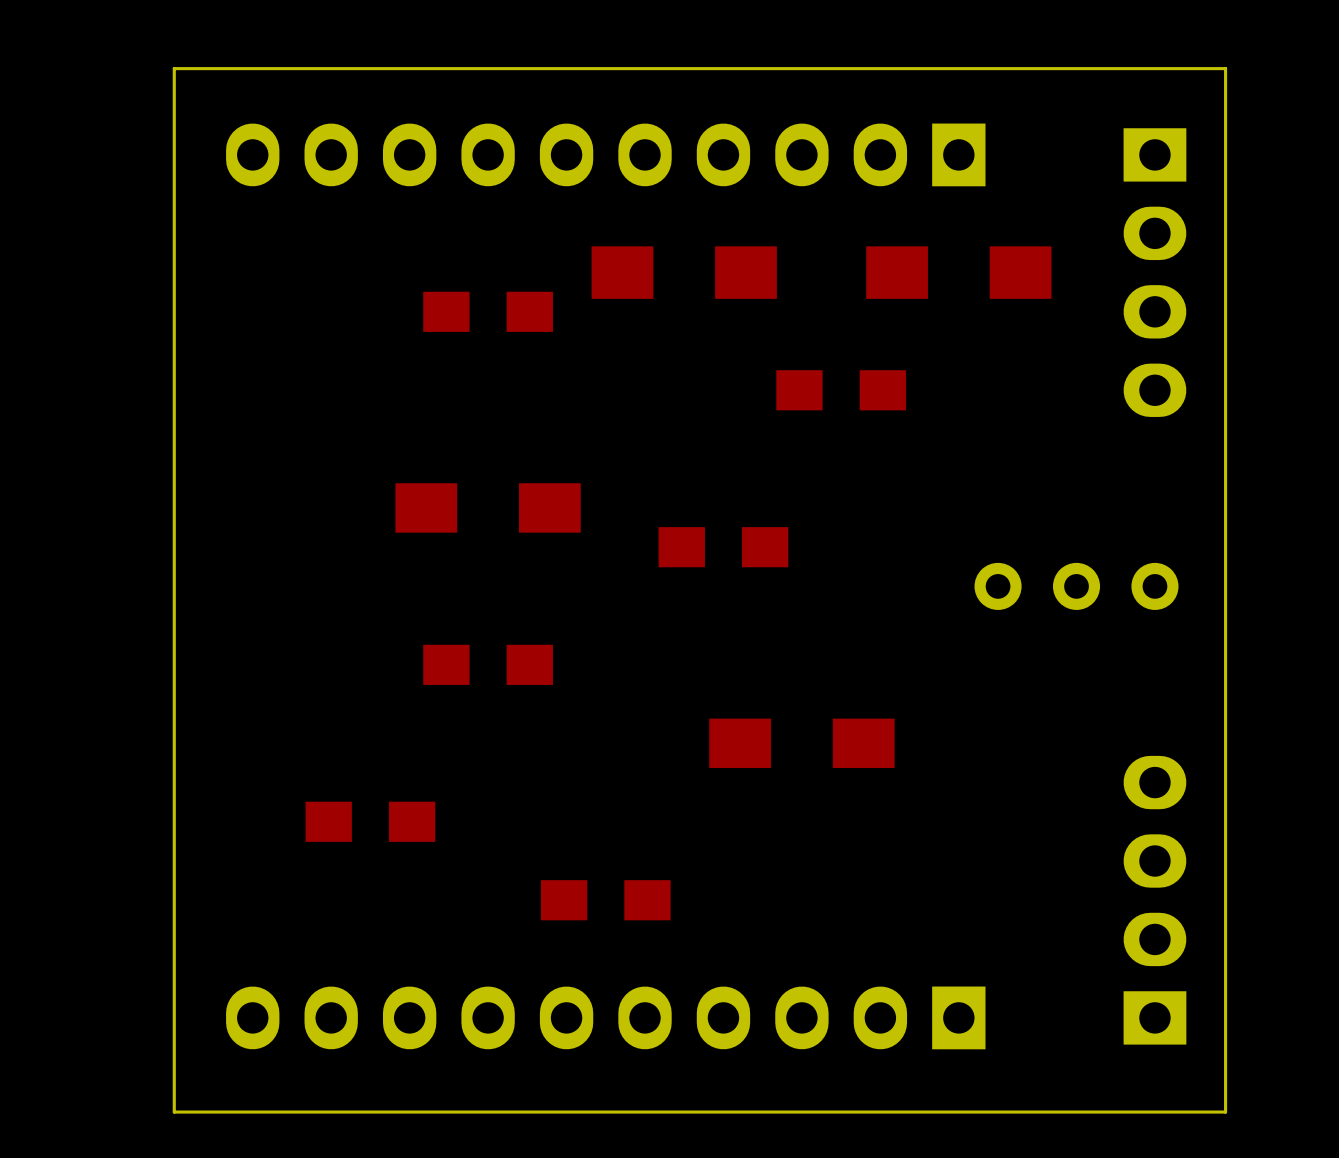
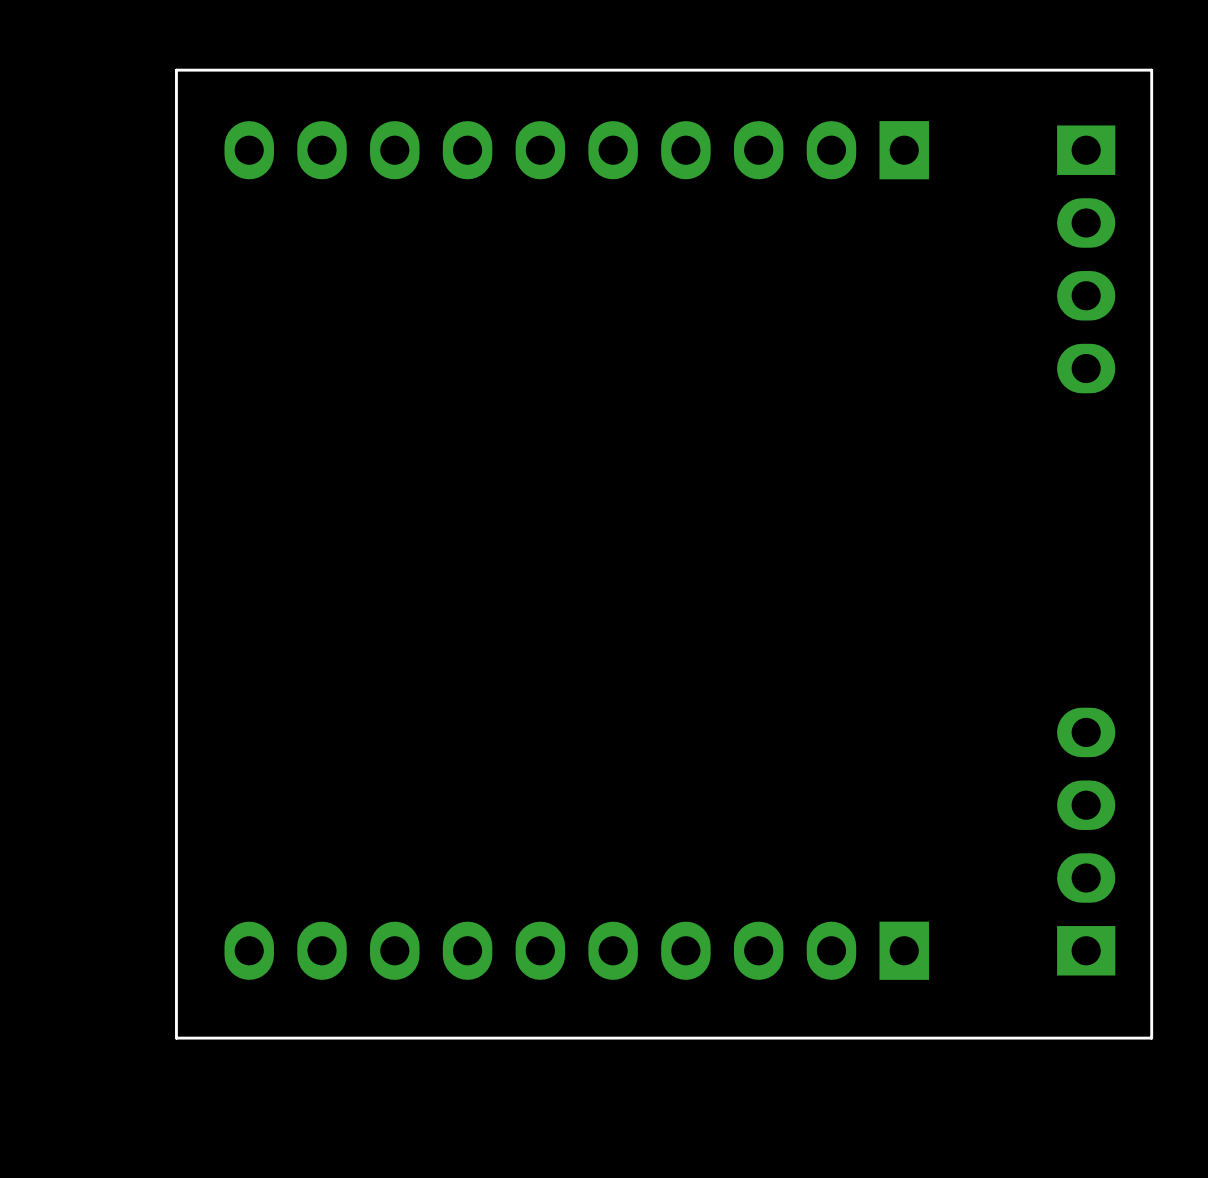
part: (684, 272) -> none
part: (958, 272) -> none
part: (488, 311) -> none
part: (841, 390) -> none
part: (488, 507) -> none
part: (723, 547) -> none
part: (1076, 586) -> none
part: (488, 664) -> none
part: (801, 743) -> none
part: (370, 821) -> none
part: (605, 900) -> none

